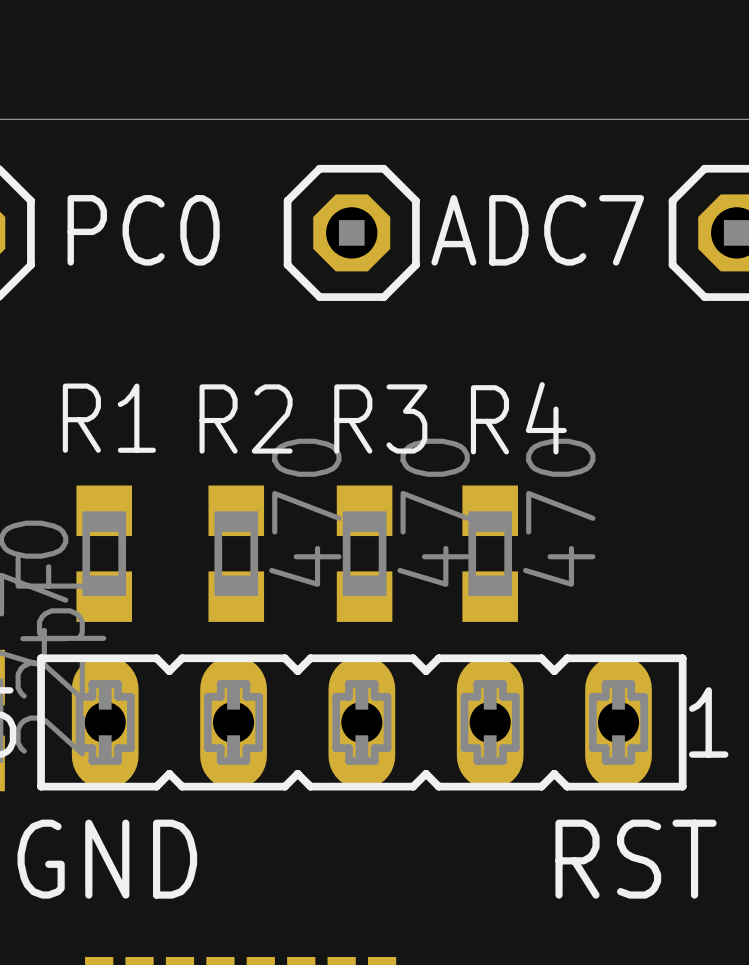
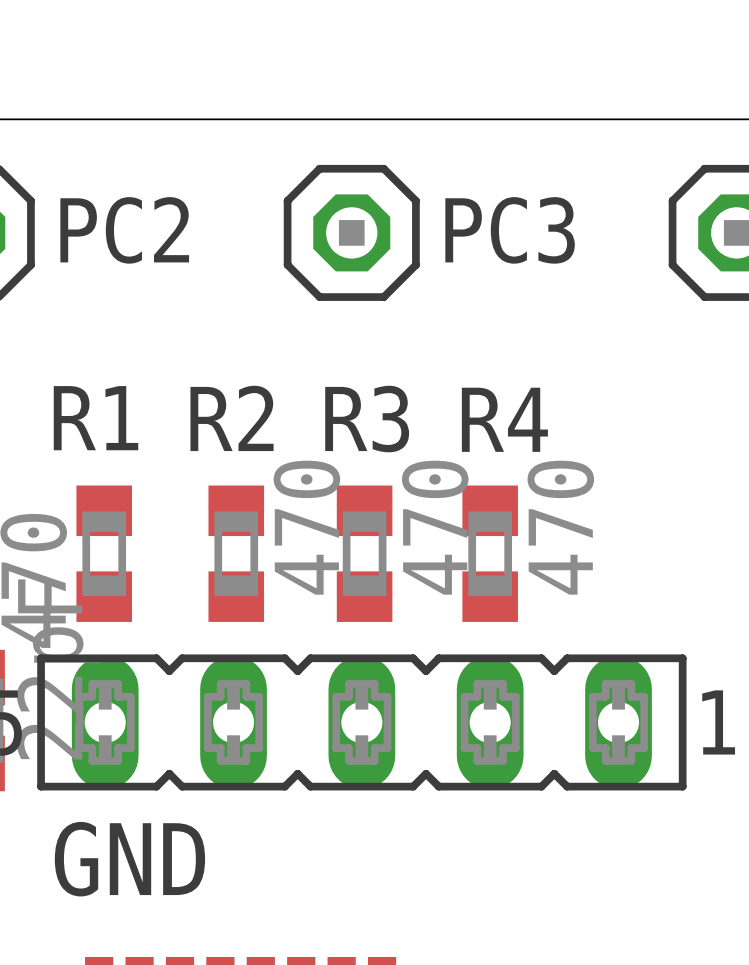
PC0 name: PC0 (143, 230) -> PC2 (124, 230)
ADC7 name: ADC7 (537, 230) -> PC3 (510, 230)
text: RST (636, 859) -> none

